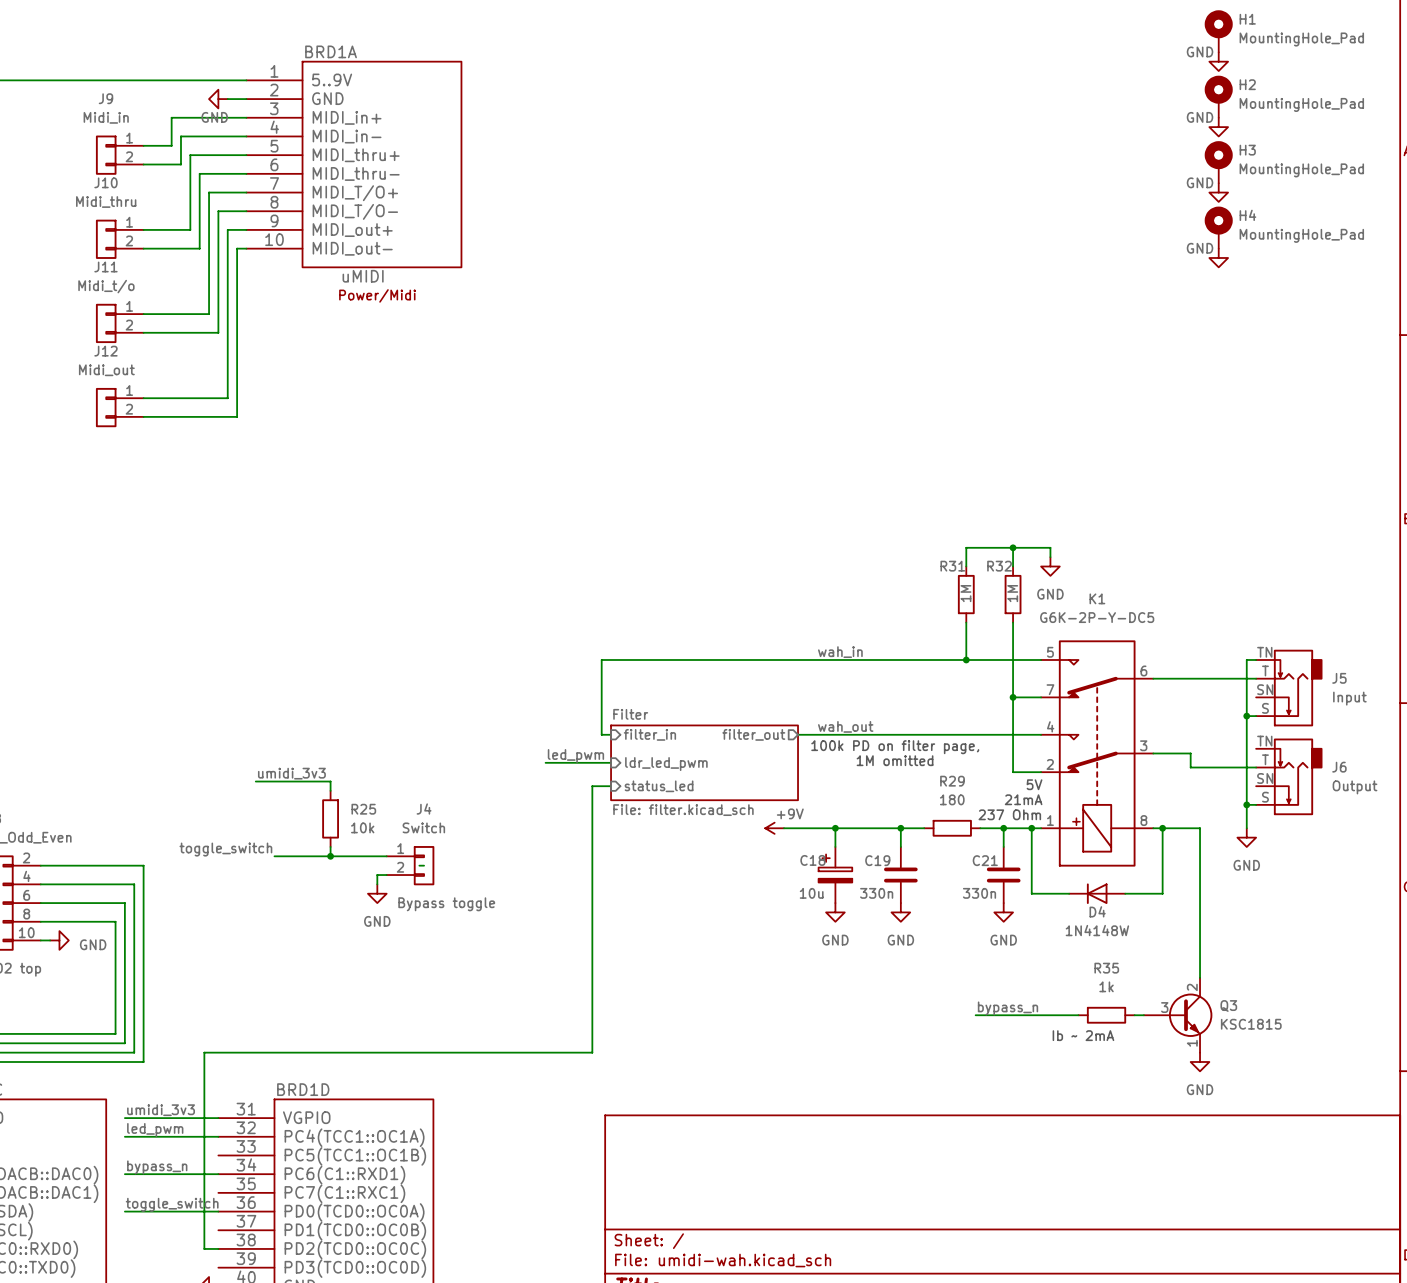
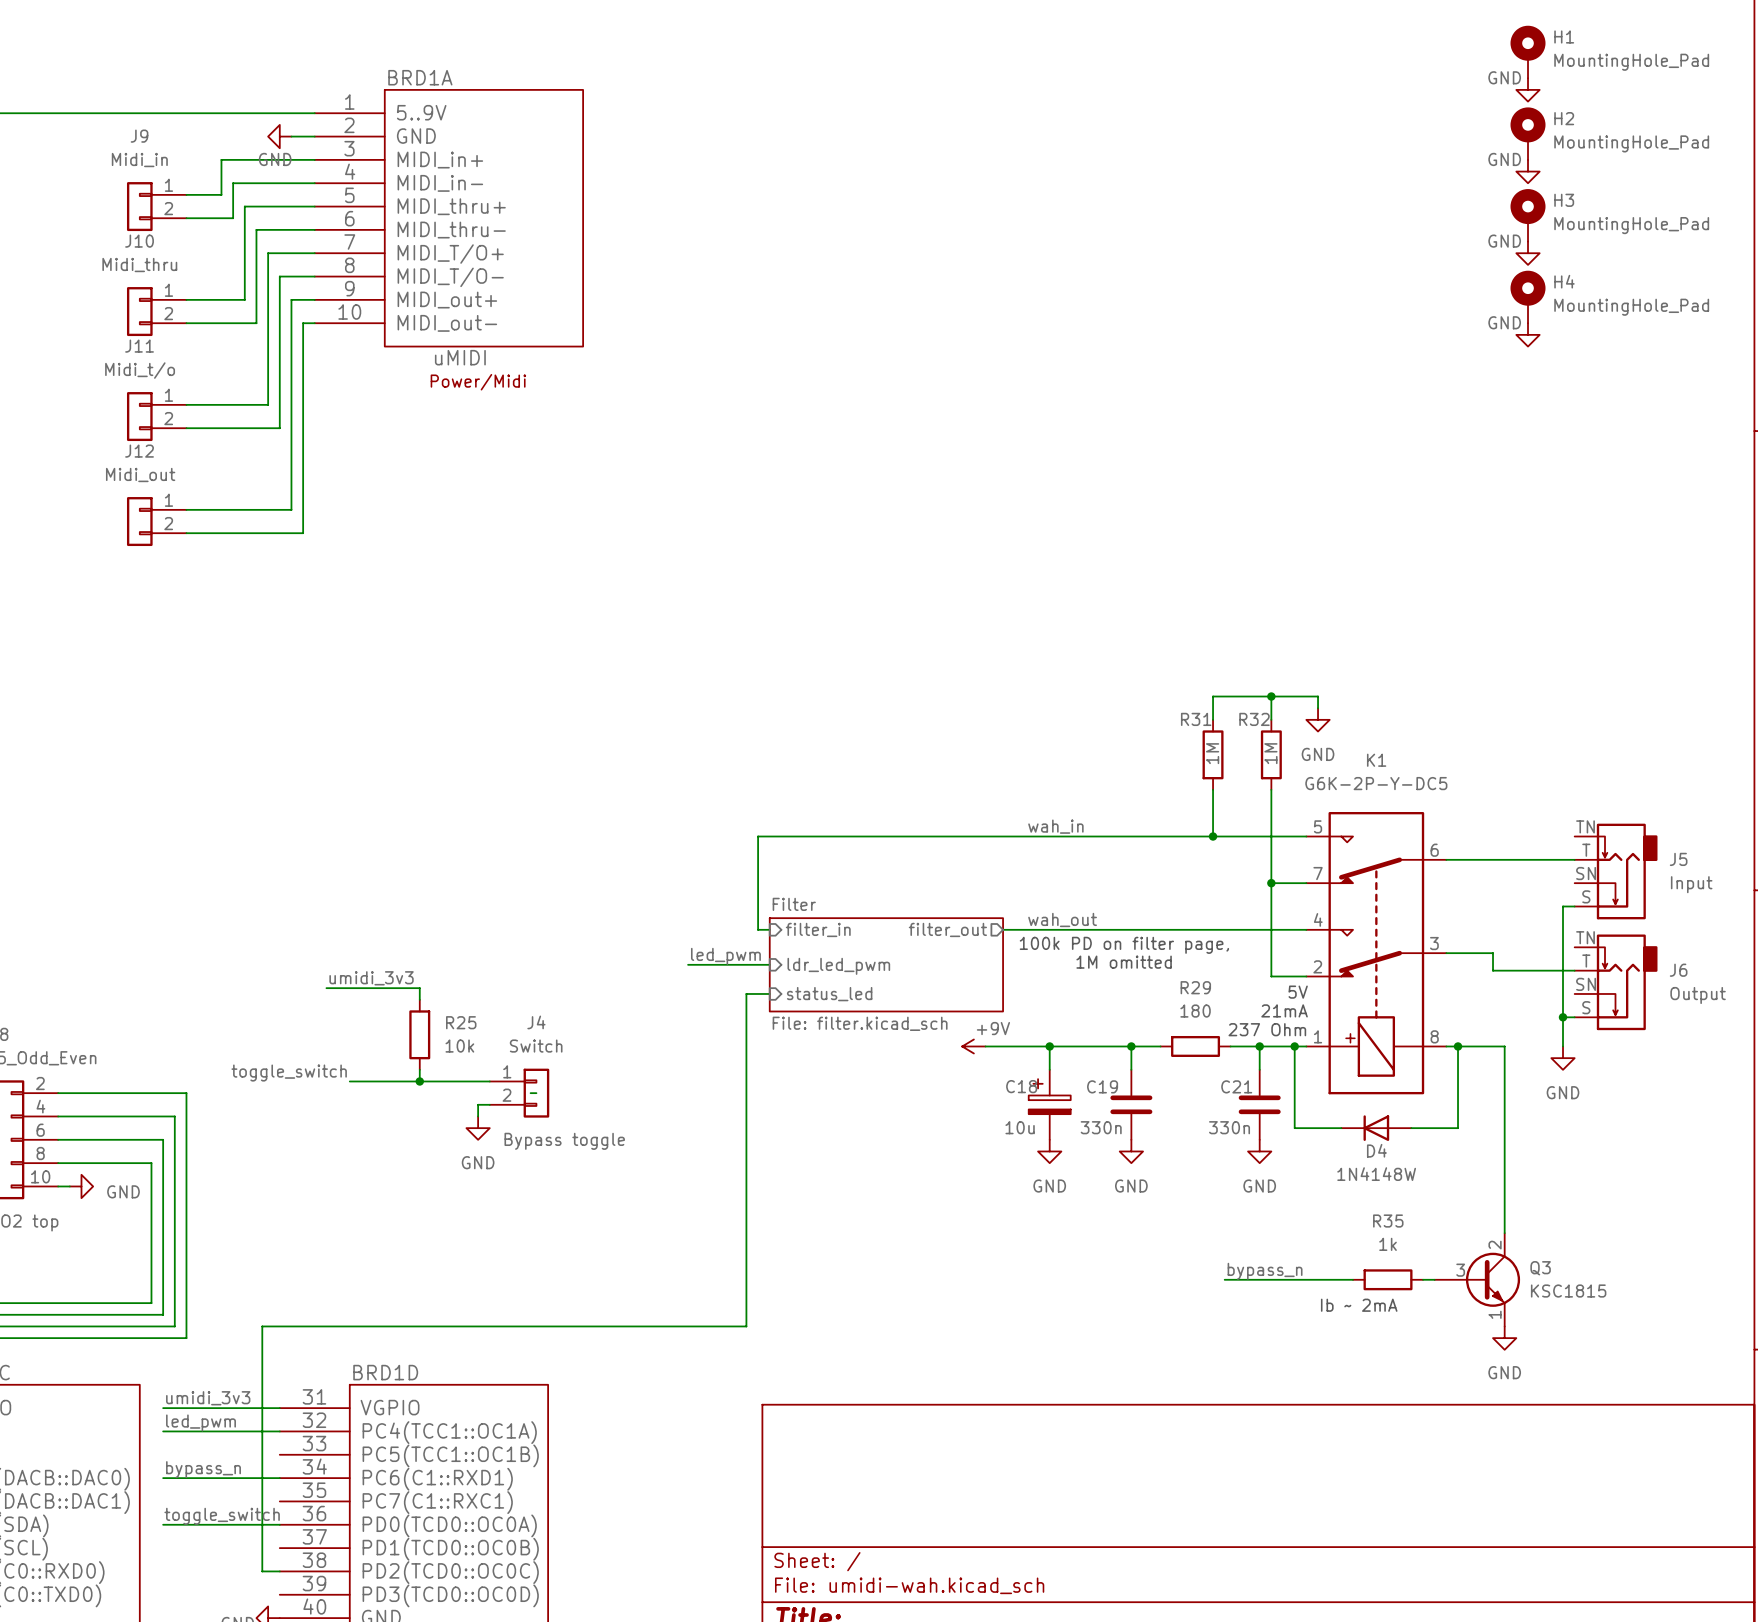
wire: (1256, 659) (1246, 659) (1246, 716) -> none
junction: (1246, 716) -> none

